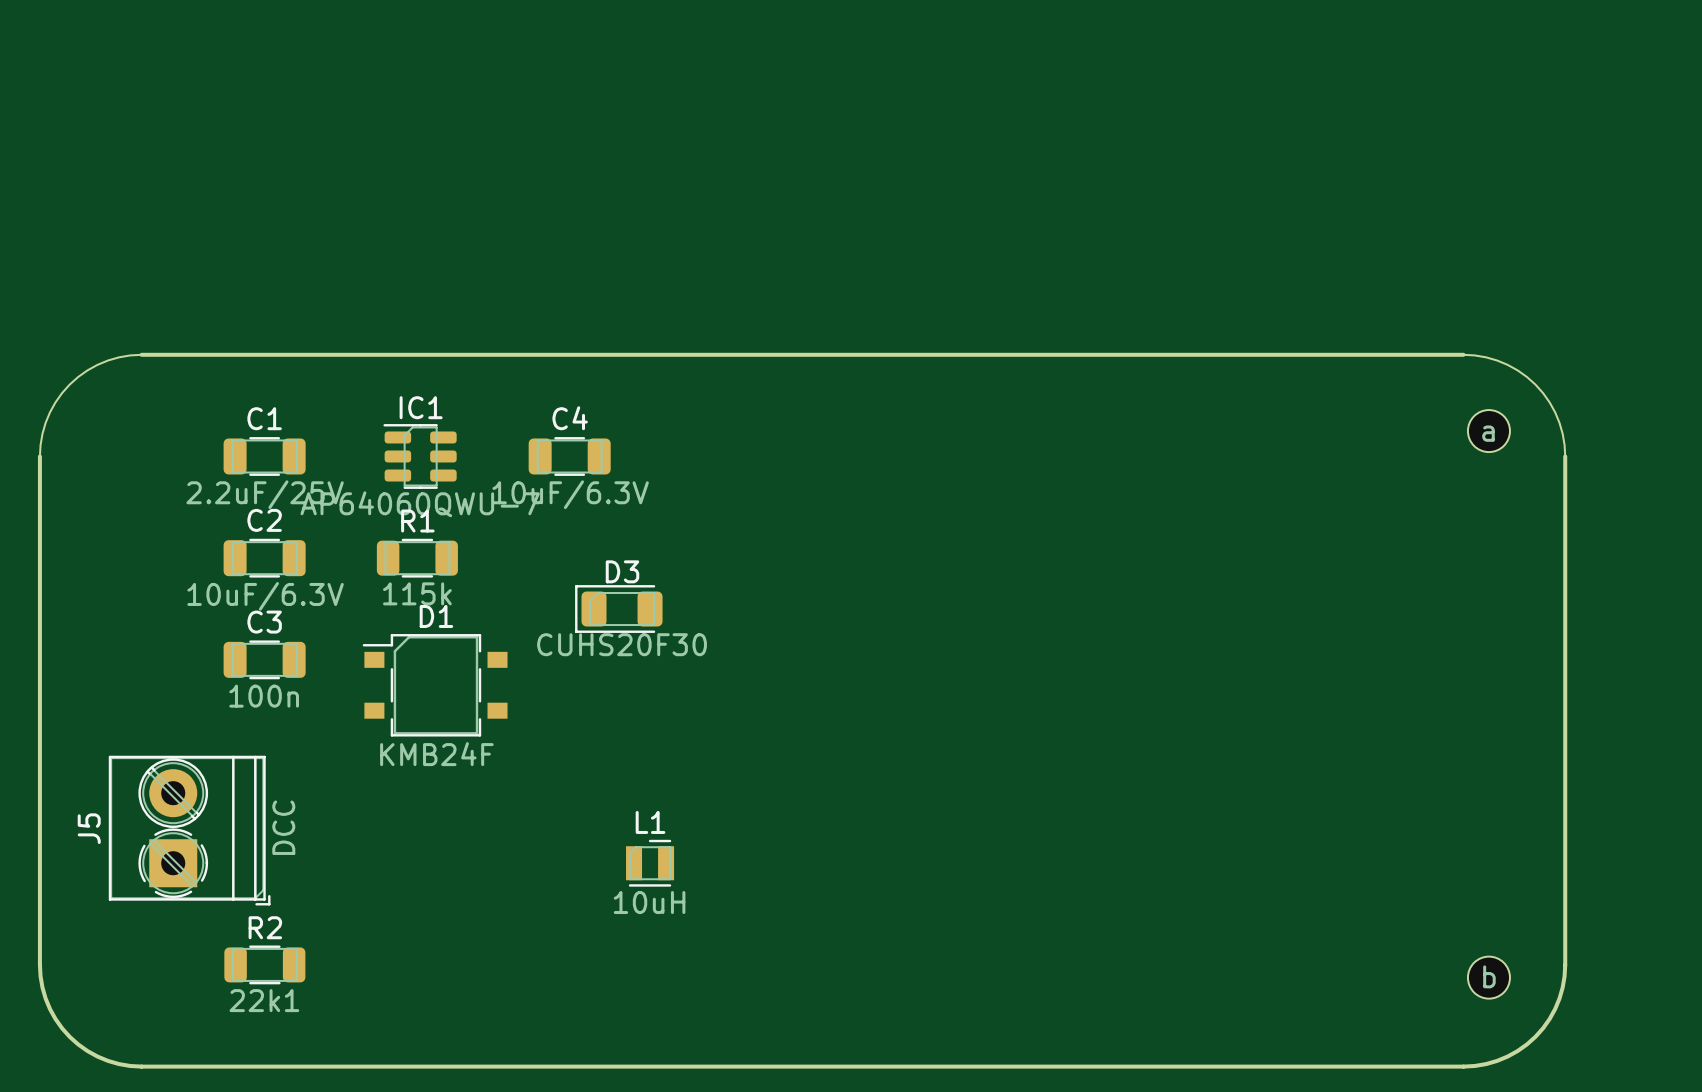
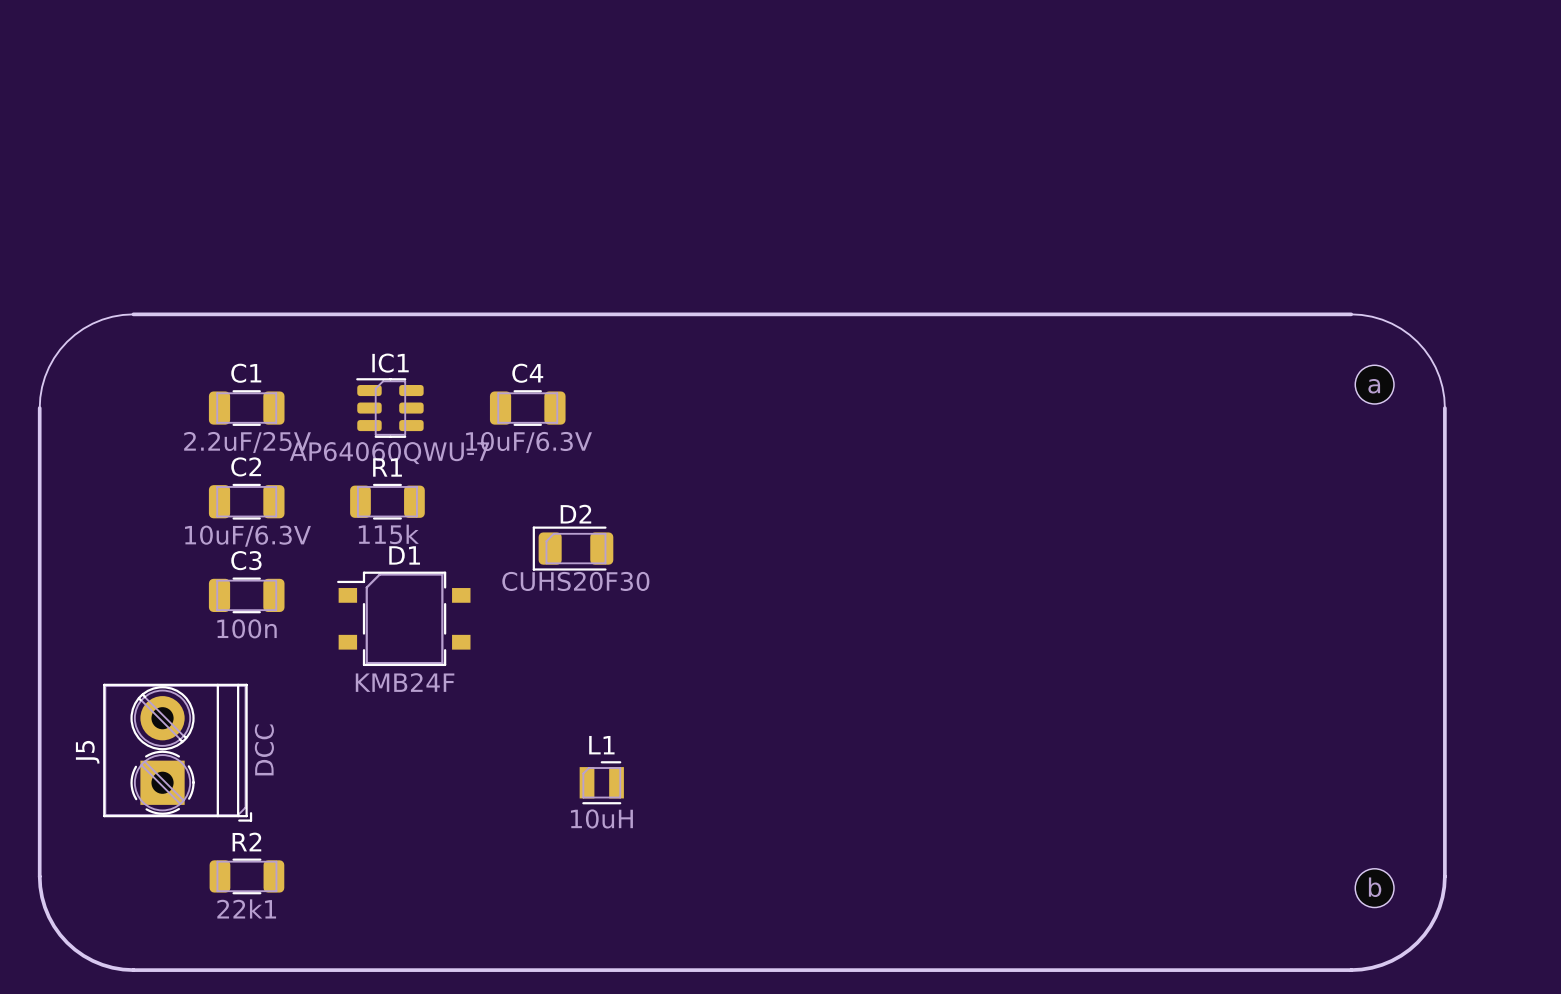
D3 name: D3 (622, 571) -> D2 (575, 514)

